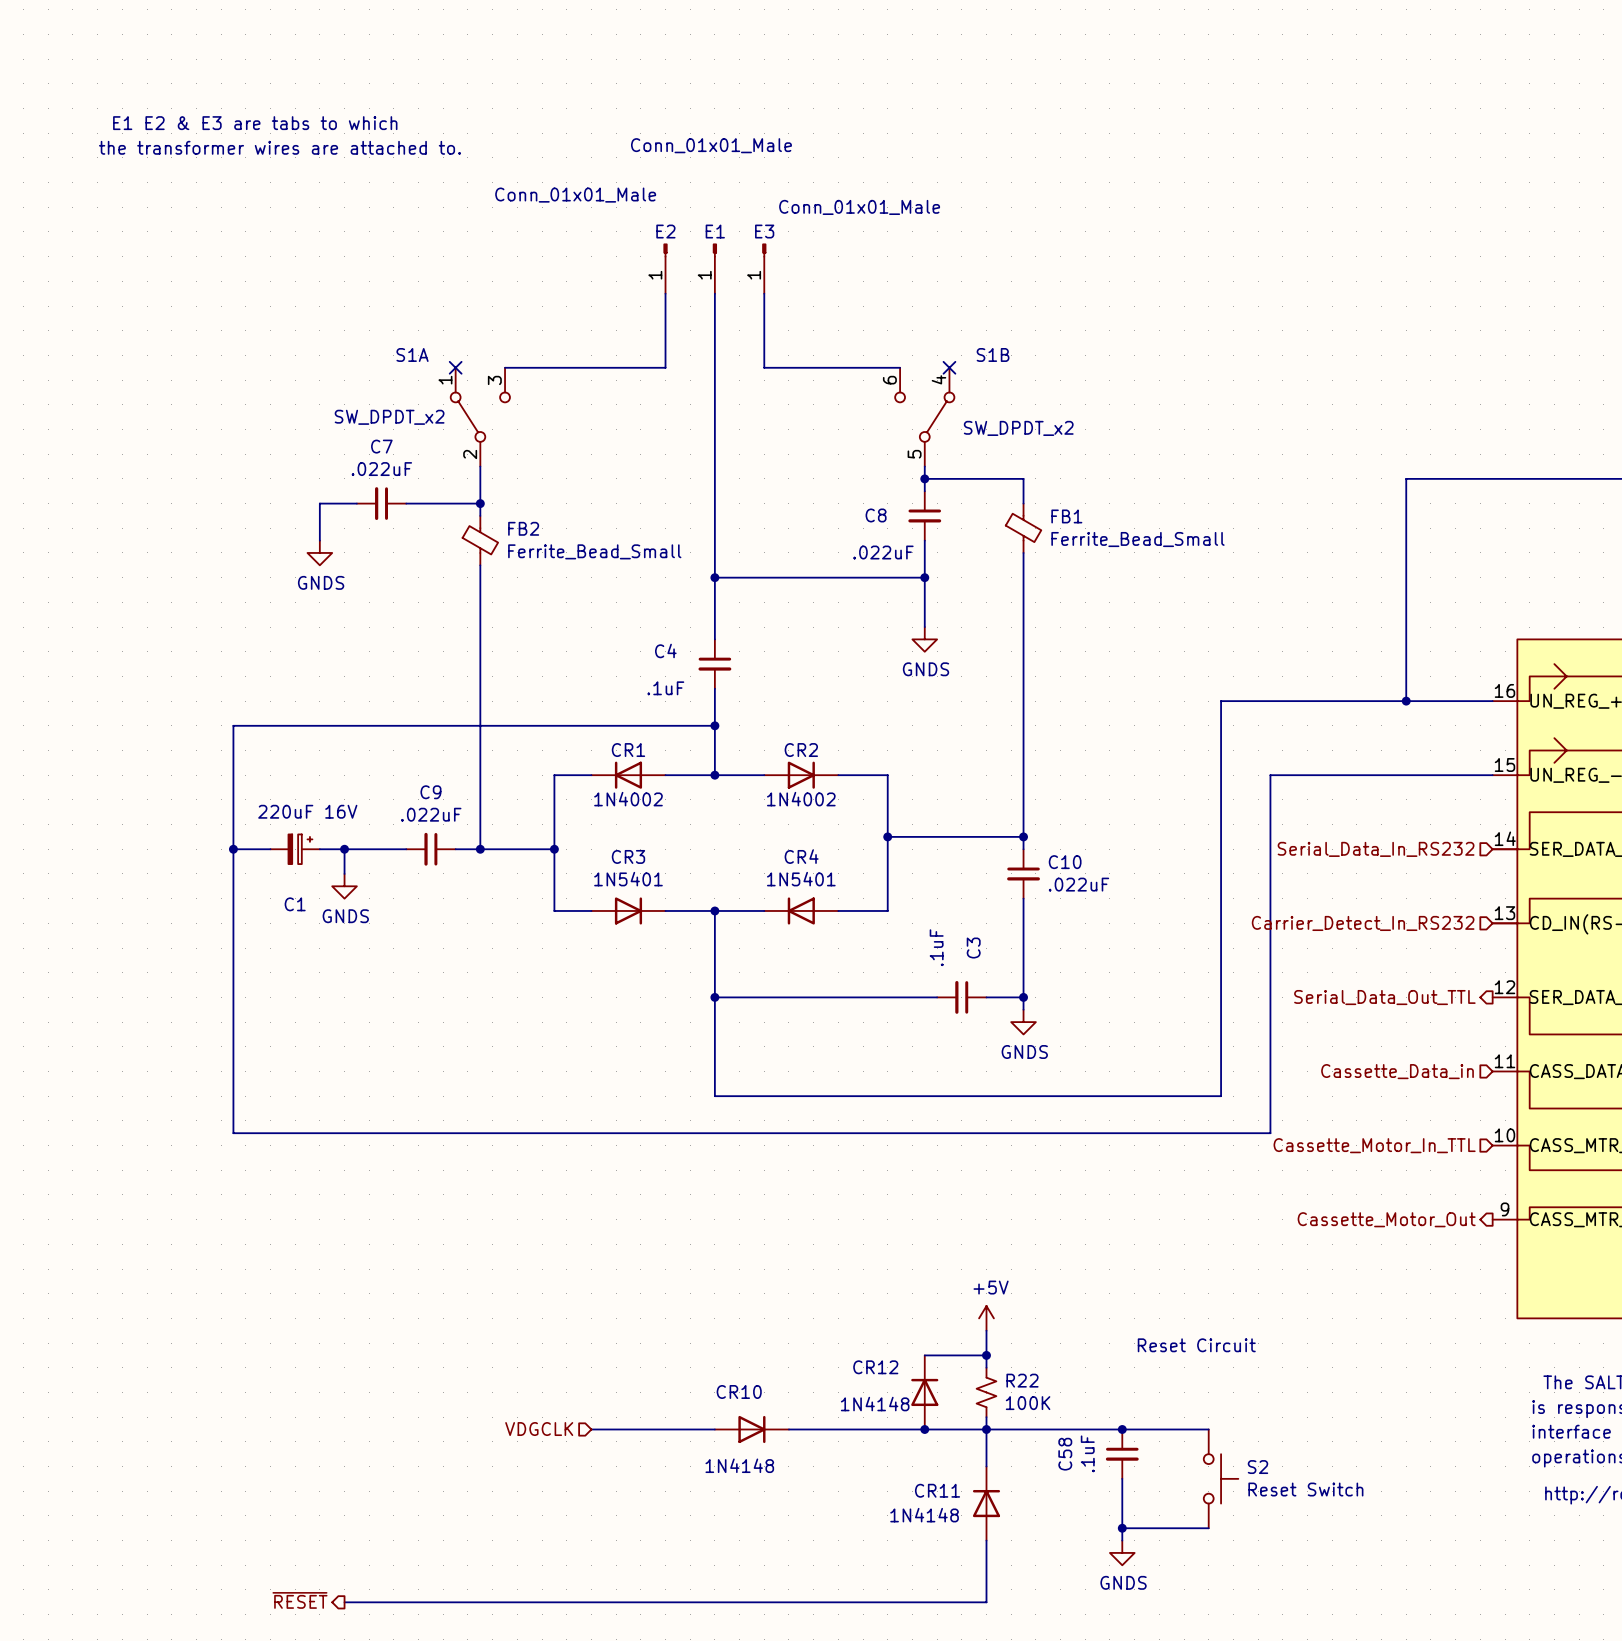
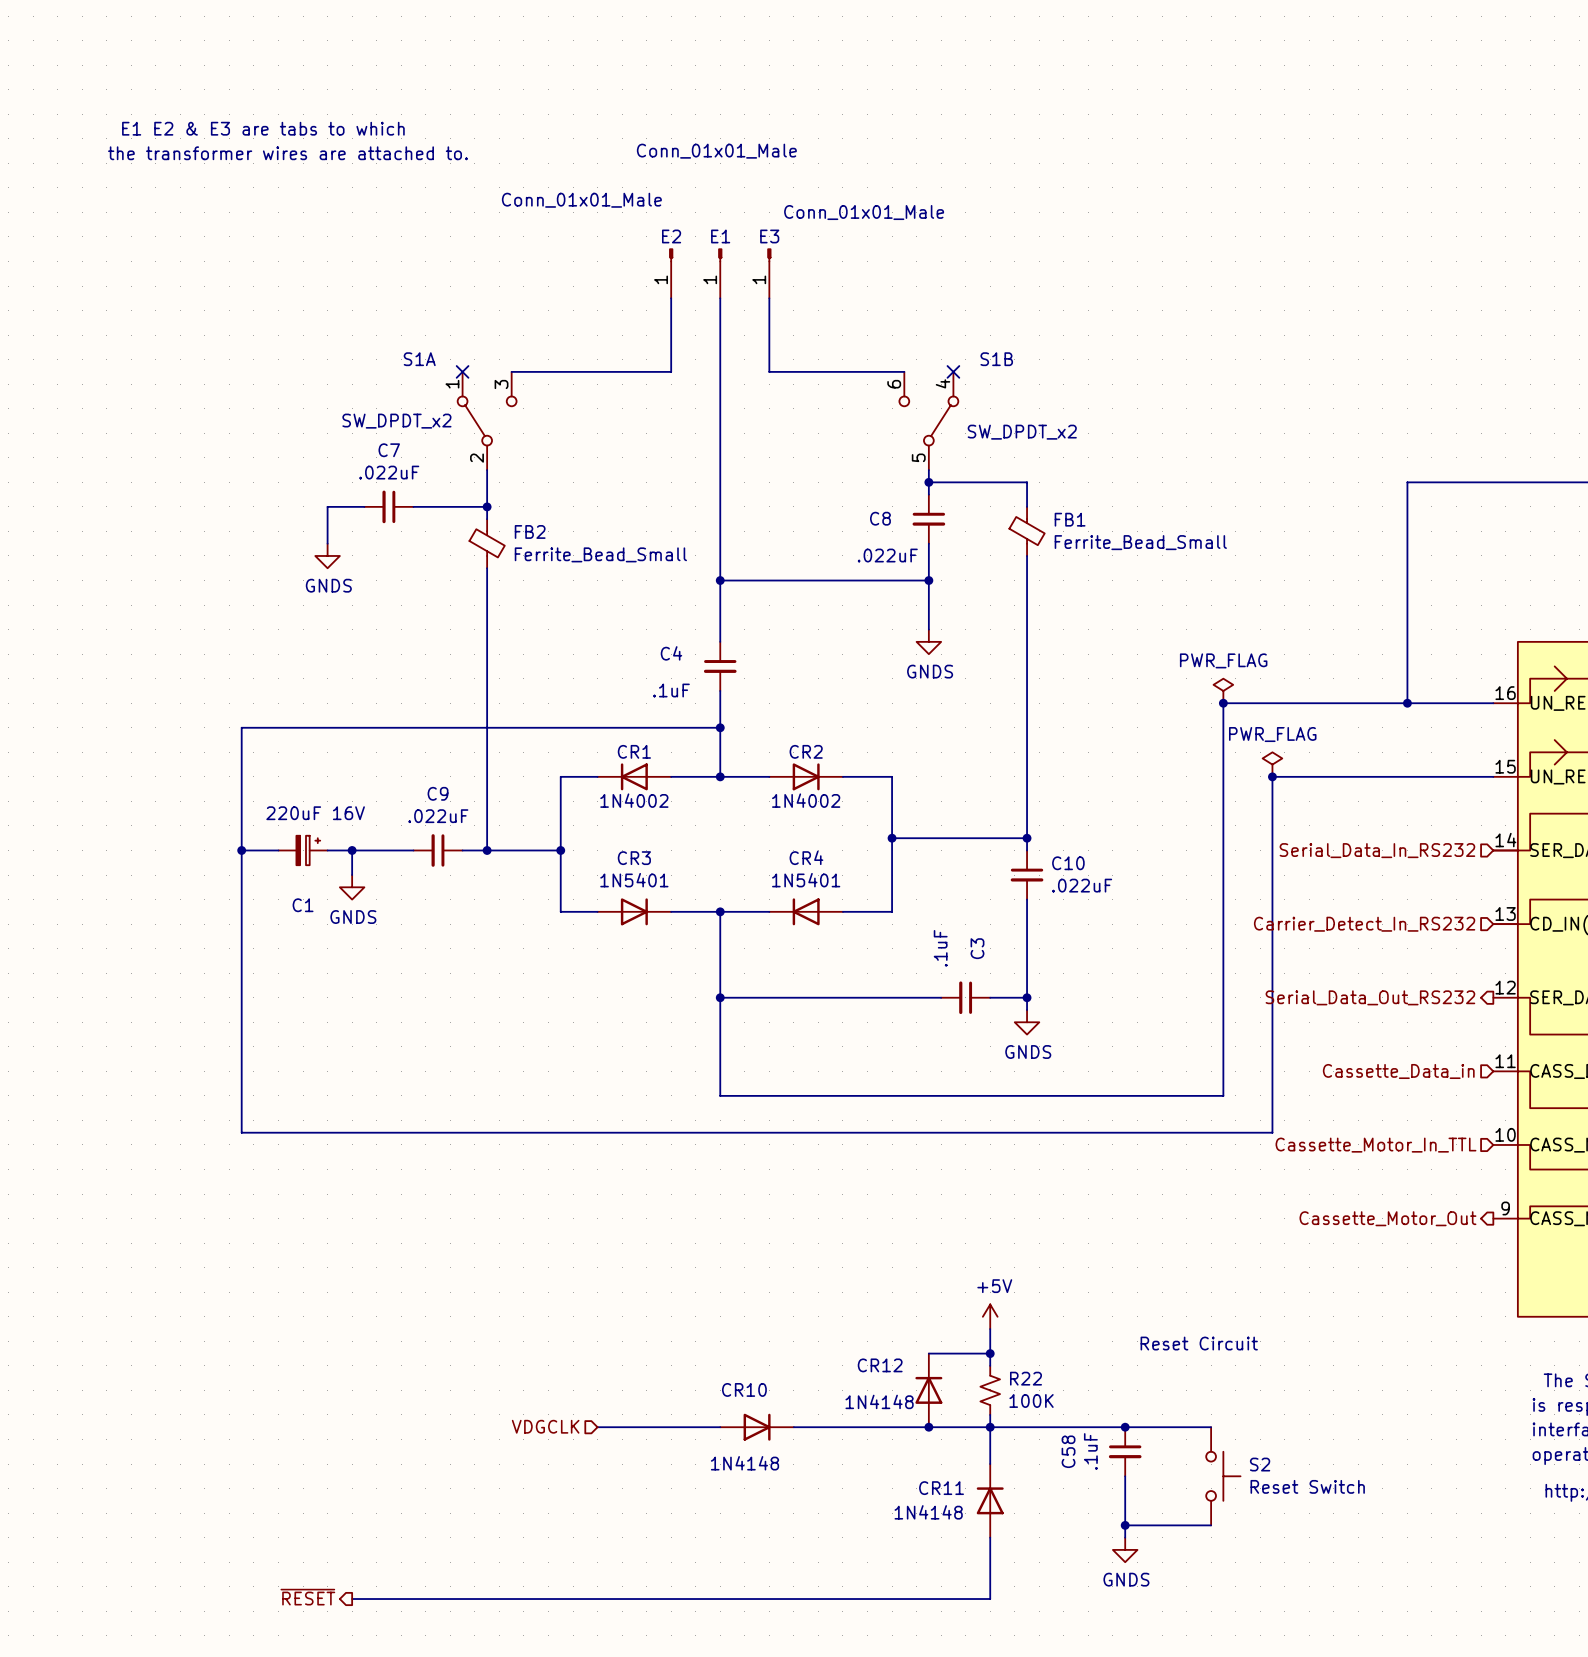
power symbol: none -> PWR_FLAG (1223, 690)
junction: none -> (1223, 703)
power symbol: none -> PWR_FLAG (1272, 764)
junction: none -> (1272, 776)
hierarchical label: Serial_Data_Out_TTL (1384, 997) -> Serial_Data_Out_RS232 (1370, 997)

